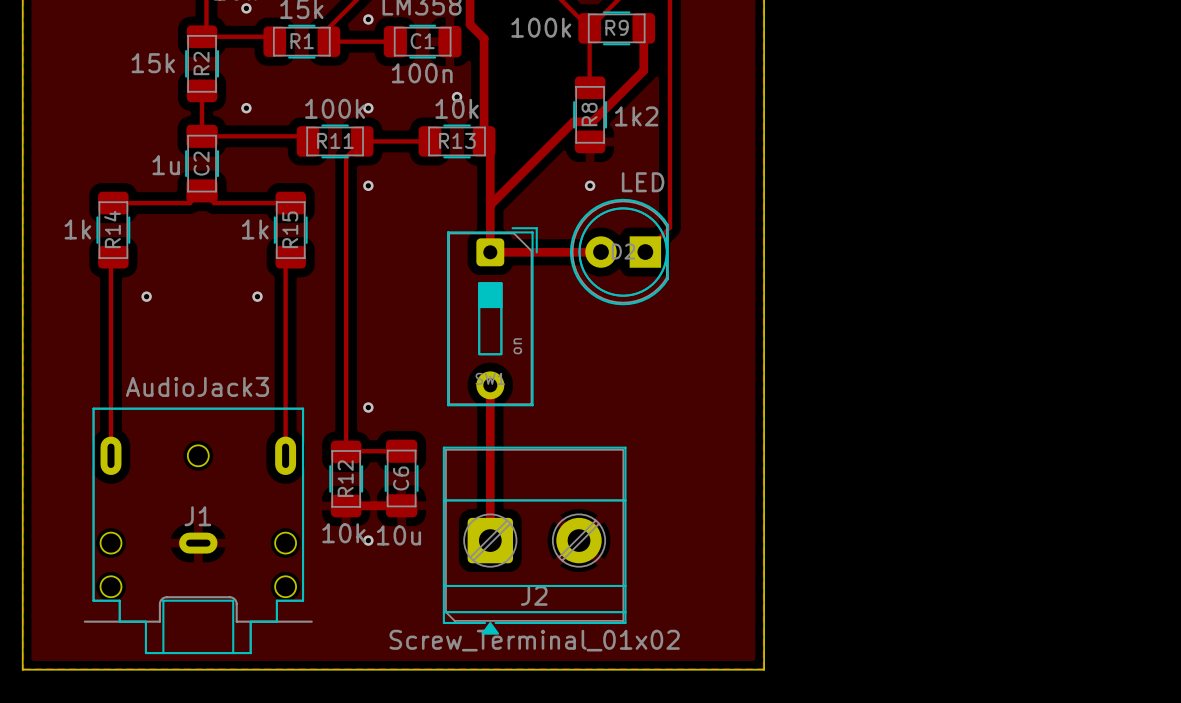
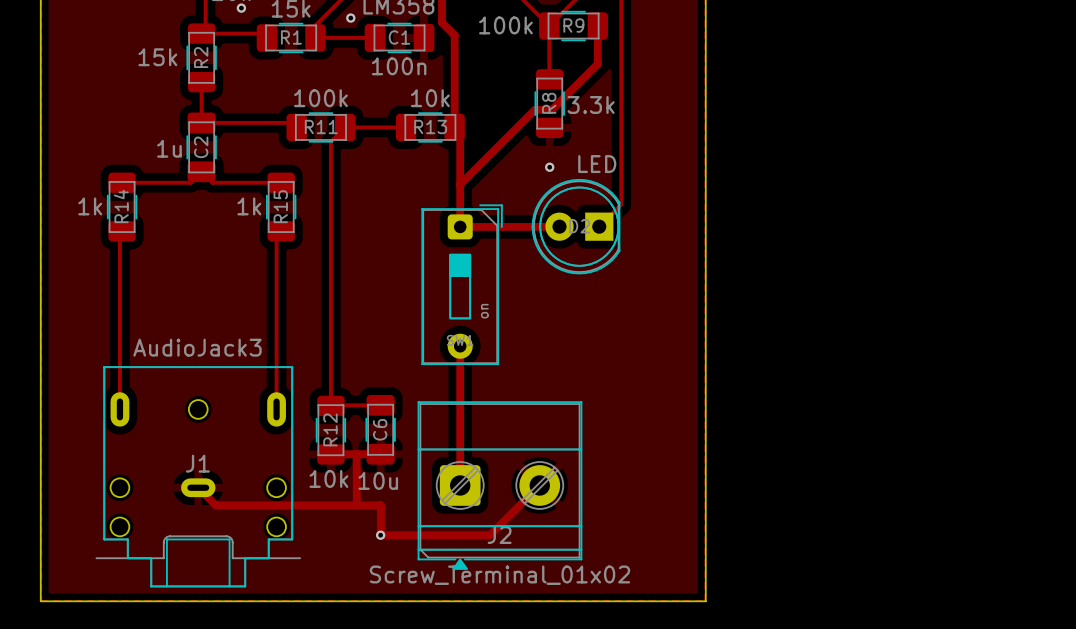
via: (457, 97) -> none
via: (246, 108) -> none
via: (368, 108) -> none
R8 value: 1k2 (636, 116) -> 3.3k (591, 104)
via: (368, 185) -> none
via: (146, 296) -> none
via: (257, 296) -> none
via: (368, 407) -> none
track: none -> (356, 454) (356, 503) (354, 505)
via position: (368, 540) -> (380, 535)
track: none -> (539, 485) (490, 535) (380, 535) (380, 505) (215, 505) (198, 487)

